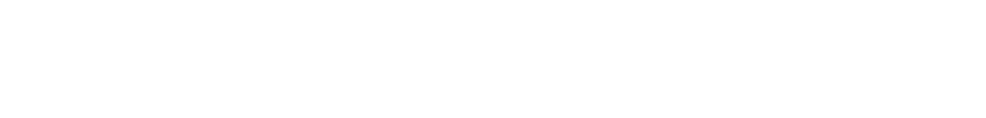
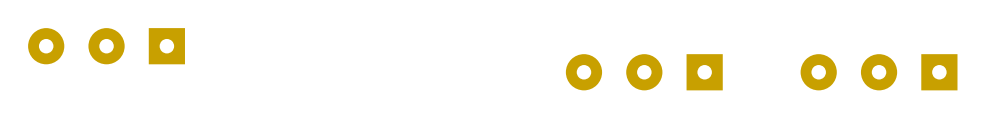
part: none -> (106, 46)
part: none -> (644, 72)
part: none -> (879, 72)

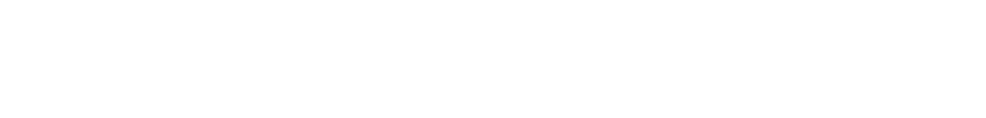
part: (106, 46) -> none
part: (644, 72) -> none
part: (879, 72) -> none

